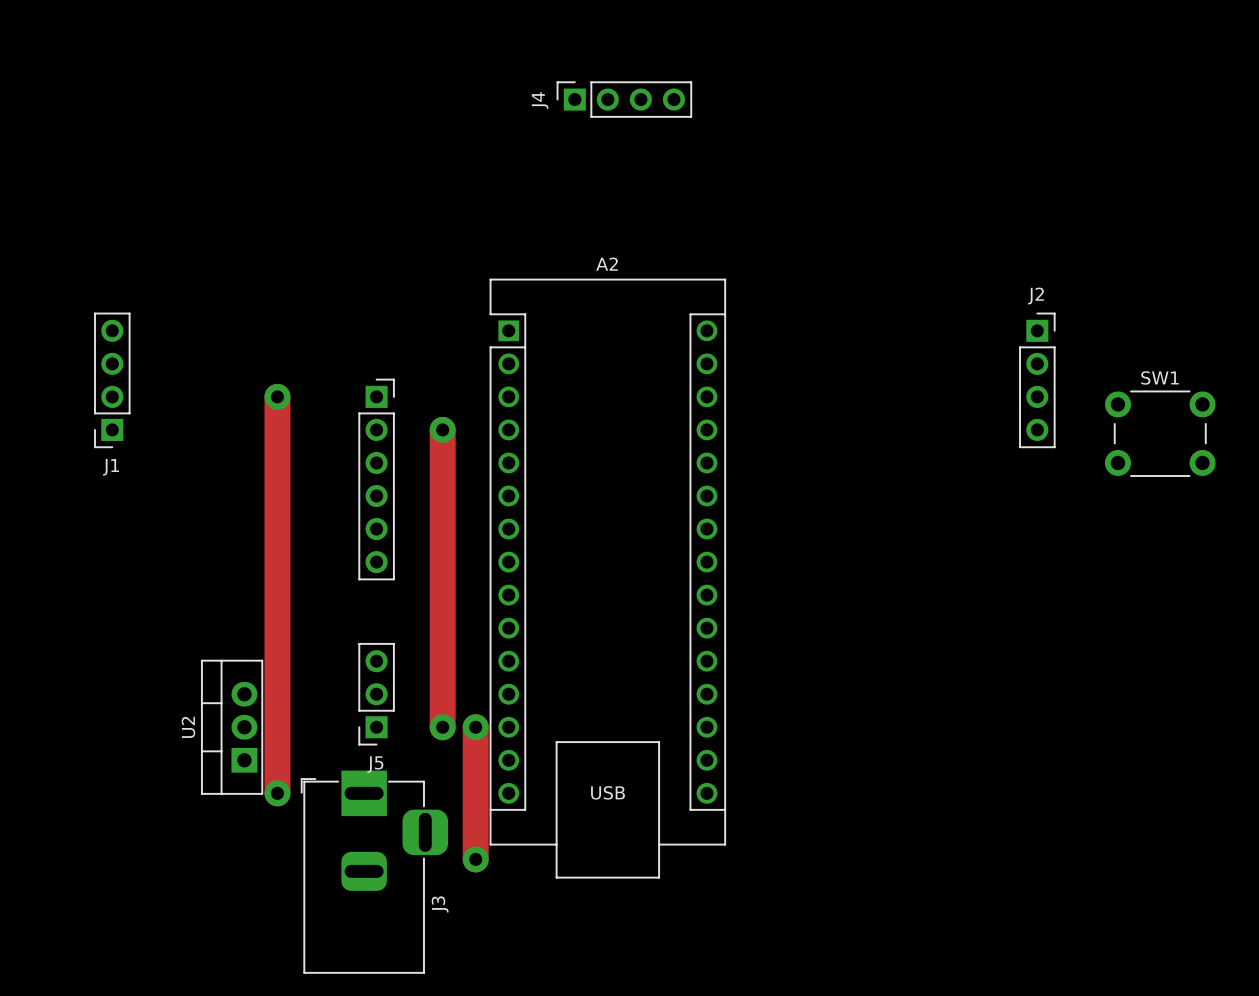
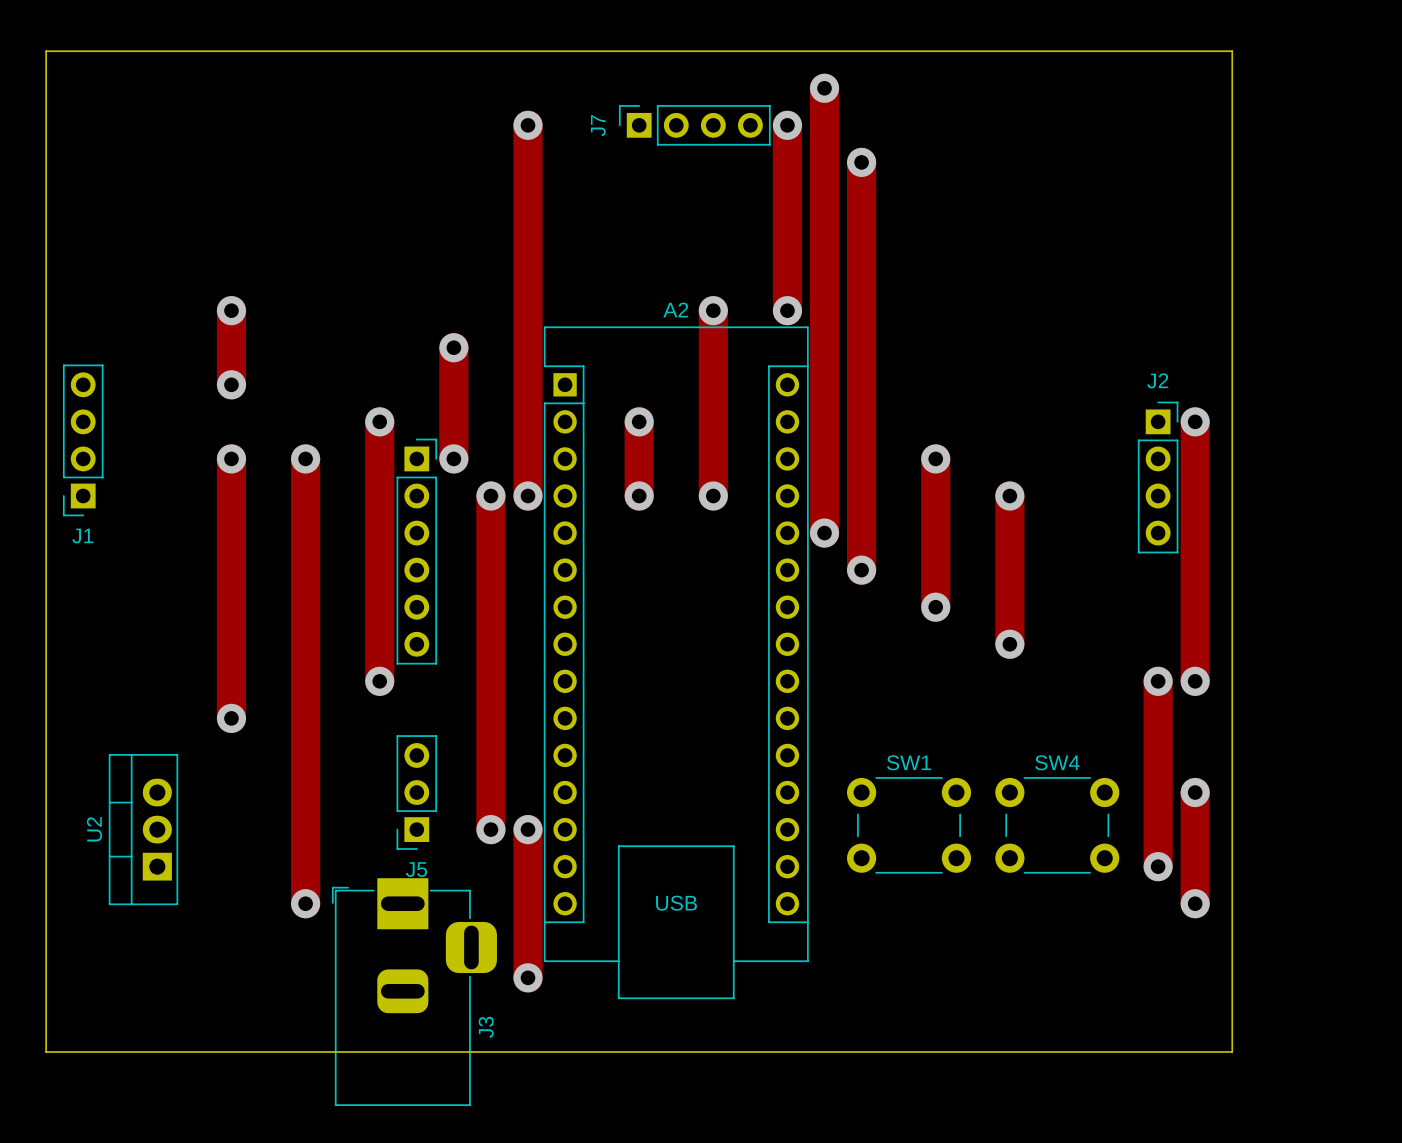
board edge: none -> (46, 51) (1232, 51) (1232, 1051) (46, 1051) (46, 51)
track: none -> (824, 88) (824, 533)
via: none -> (824, 88)
track: none -> (528, 125) (528, 496)
via: none -> (528, 125)
track: none -> (787, 125) (787, 310)
via: none -> (787, 125)
J4 name: J4 (540, 100) -> J7 (598, 125)
track: none -> (861, 162) (861, 570)
via: none -> (861, 162)
track: none -> (231, 310) (231, 384)
via: none -> (231, 310)
track: none -> (713, 310) (713, 496)
via: none -> (713, 310)
via: none -> (787, 310)
track: none -> (453, 347) (453, 458)
via: none -> (453, 347)
via: none -> (231, 384)
track: none -> (379, 421) (379, 681)
via: none -> (379, 421)
track: none -> (639, 421) (639, 496)
via: none -> (639, 421)
track: none -> (1195, 421) (1195, 681)
via: none -> (1195, 421)
J1 position: (112, 380) -> (83, 440)
J2 position: (1037, 380) -> (1158, 477)
track: none -> (231, 458) (231, 718)
via: none -> (231, 458)
via: none -> (453, 458)
track: none -> (935, 458) (935, 607)
via: none -> (935, 458)
via: none -> (528, 496)
via: none -> (639, 496)
via: none -> (713, 496)
track: none -> (1009, 496) (1009, 644)
via: none -> (1009, 496)
SW1 position: (1160, 433) -> (909, 825)
via: none -> (824, 533)
via: none -> (861, 570)
via: none -> (935, 607)
via: none -> (1009, 644)
via: none -> (379, 681)
track: none -> (1158, 681) (1158, 866)
via: none -> (1158, 681)
via: none -> (1195, 681)
via: none -> (231, 718)
track: none -> (1195, 792) (1195, 903)
via: none -> (1195, 792)
SW4: none -> (1057, 825)
U2 position: (232, 727) -> (143, 829)
via: none -> (1158, 866)
via: none -> (1195, 903)

